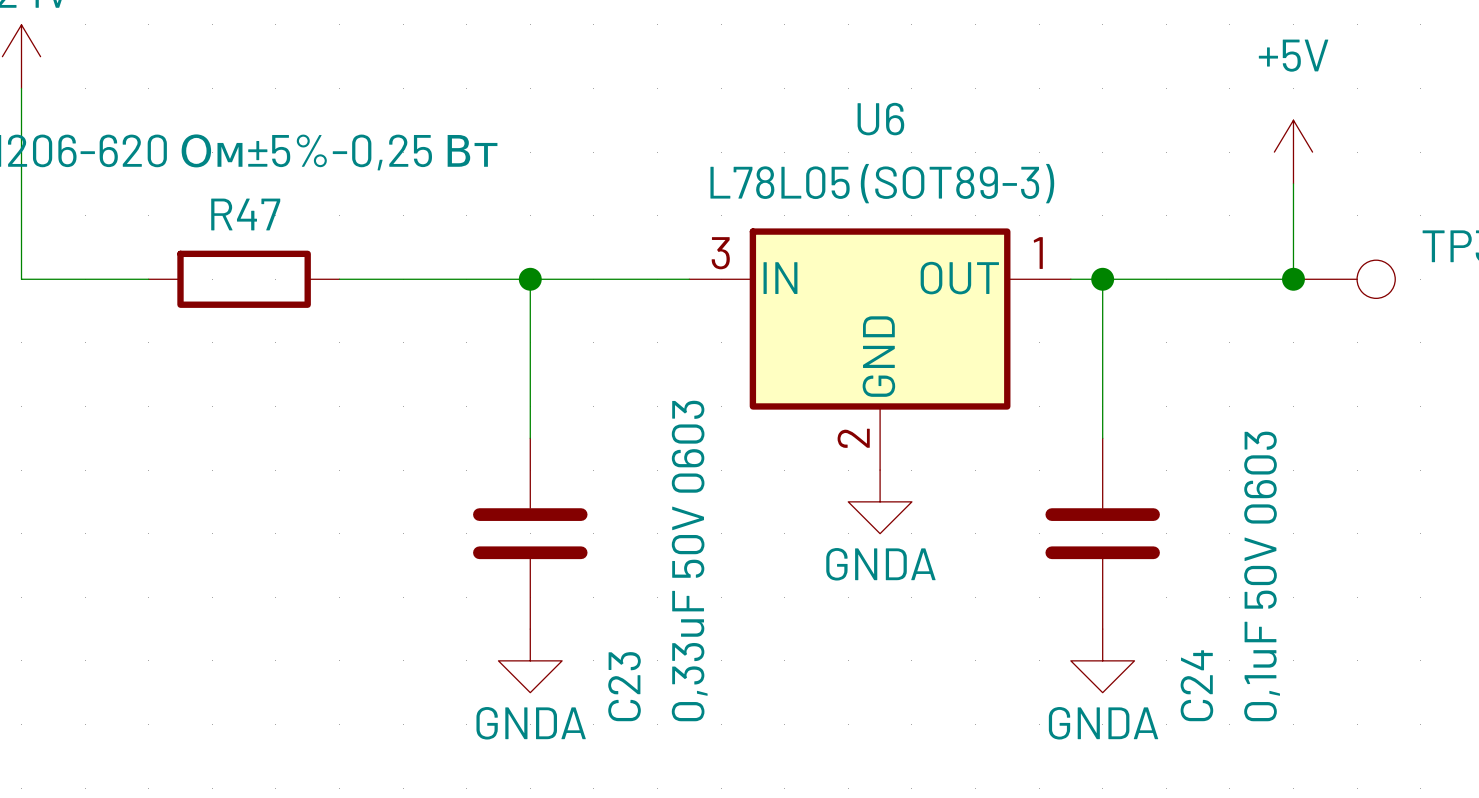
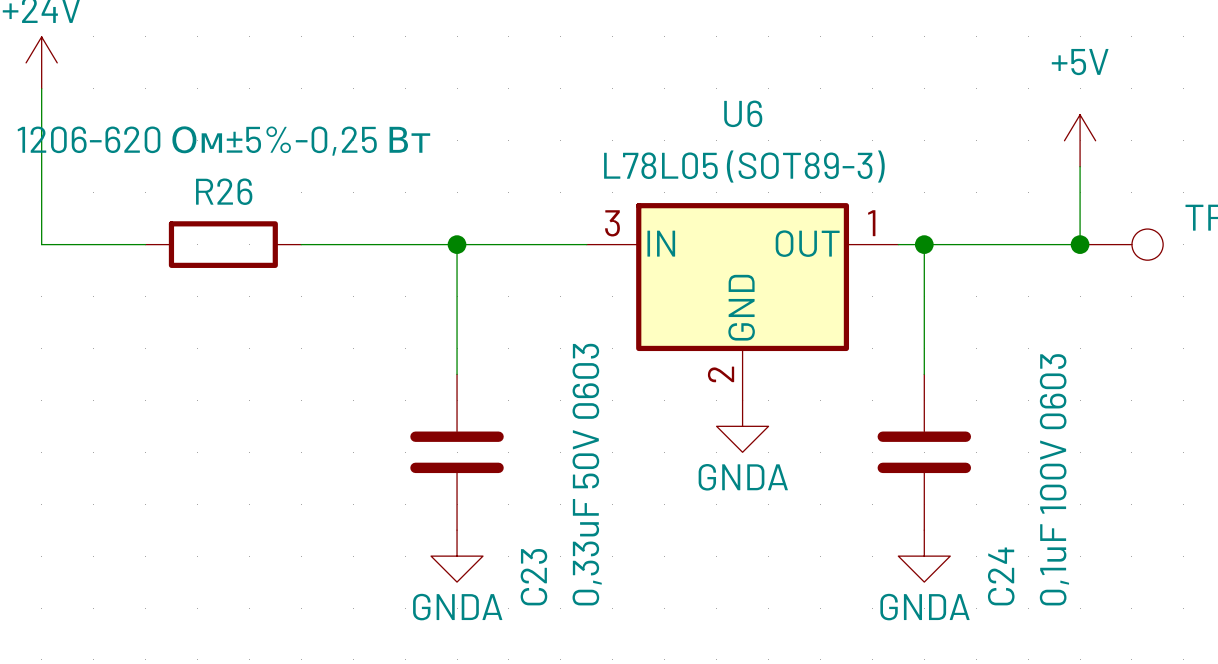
R47 name: R47 (245, 214) -> R26 (224, 191)
C24 value: 0,1uF 50V 0603 (1262, 576) -> 0,1uF 100V 0603 (1054, 479)

